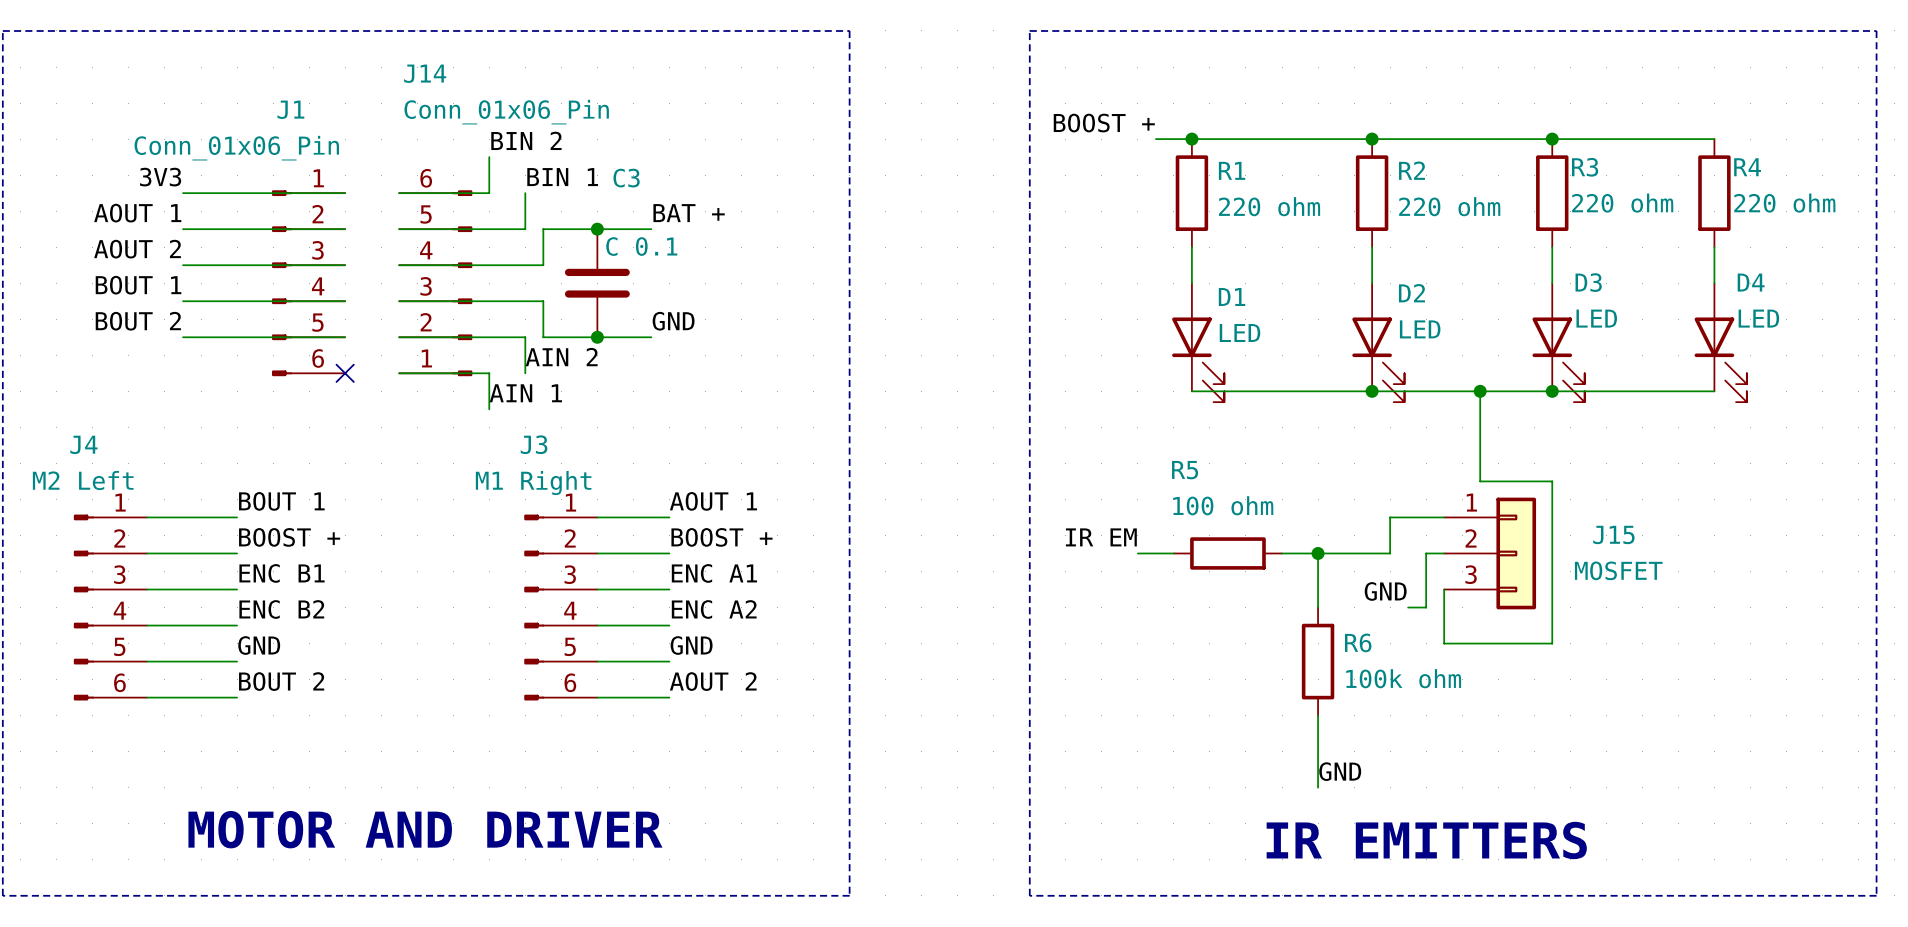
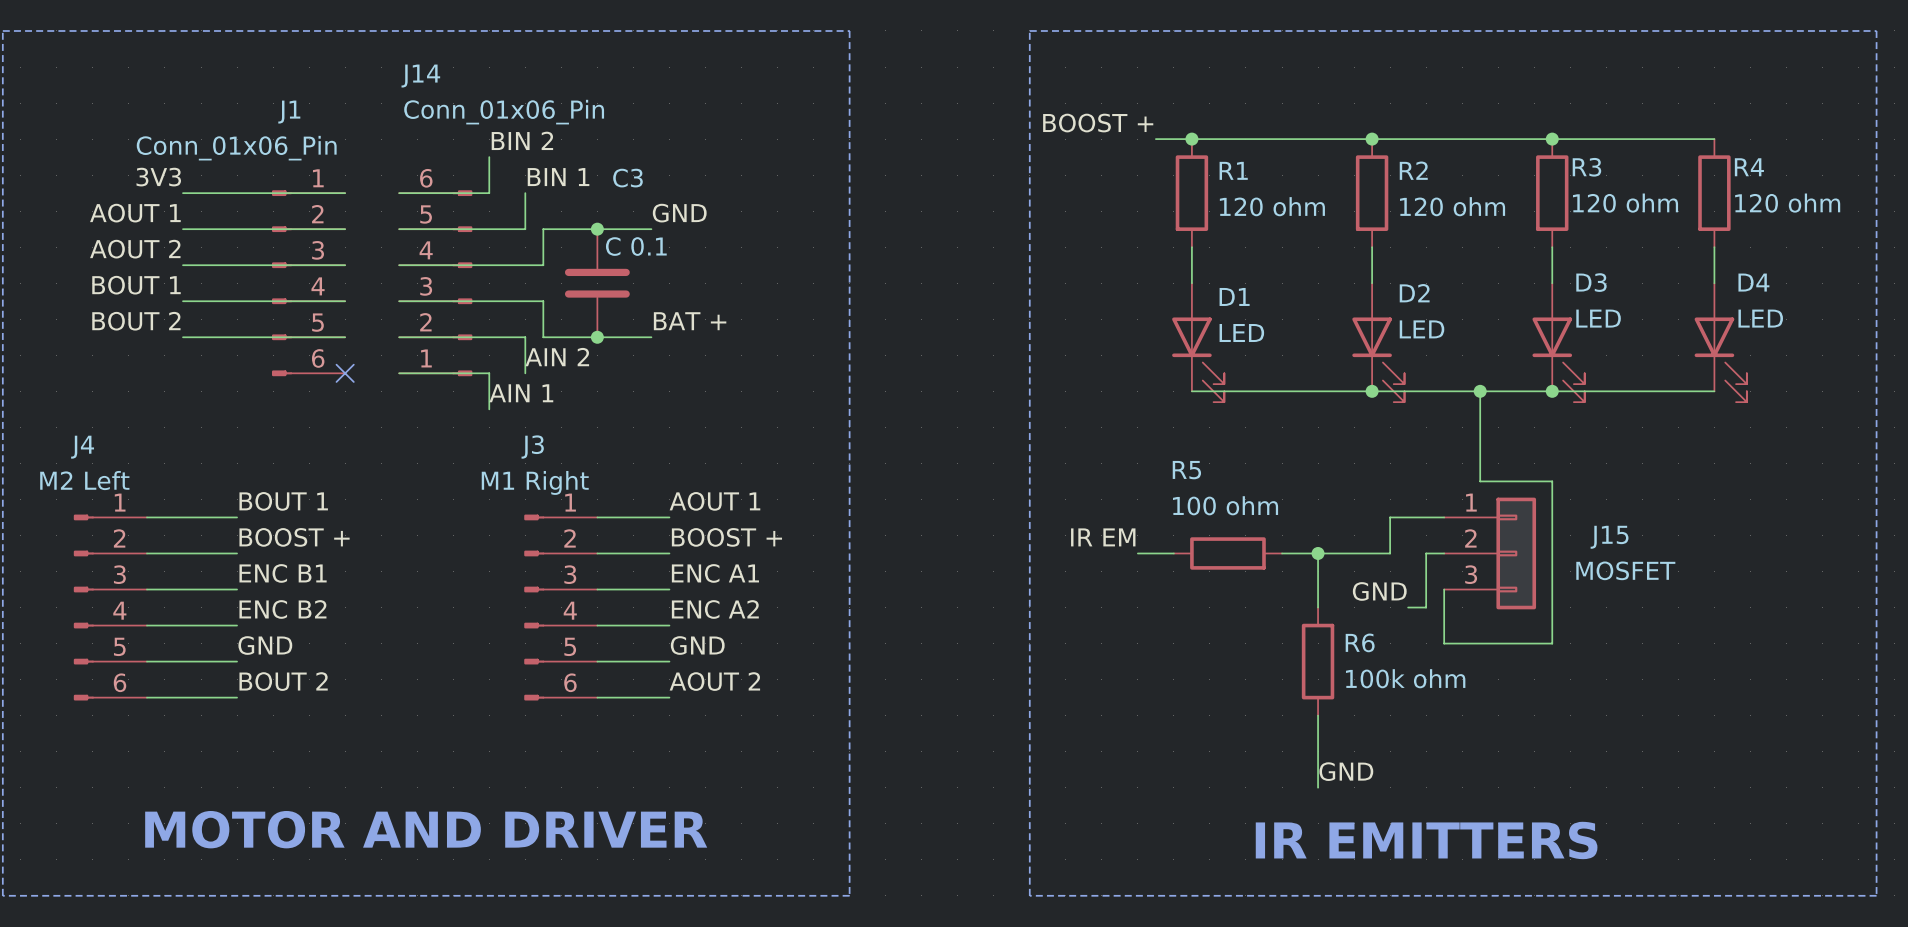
R3 value: 220 ohm (1622, 203) -> 120 ohm (1625, 203)
R4 value: 220 ohm (1784, 203) -> 120 ohm (1787, 203)
R1 value: 220 ohm (1269, 206) -> 120 ohm (1272, 206)
R2 value: 220 ohm (1449, 206) -> 120 ohm (1452, 206)
label: BAT + (689, 213) -> GND (679, 213)
label: GND (673, 321) -> BAT + (690, 321)

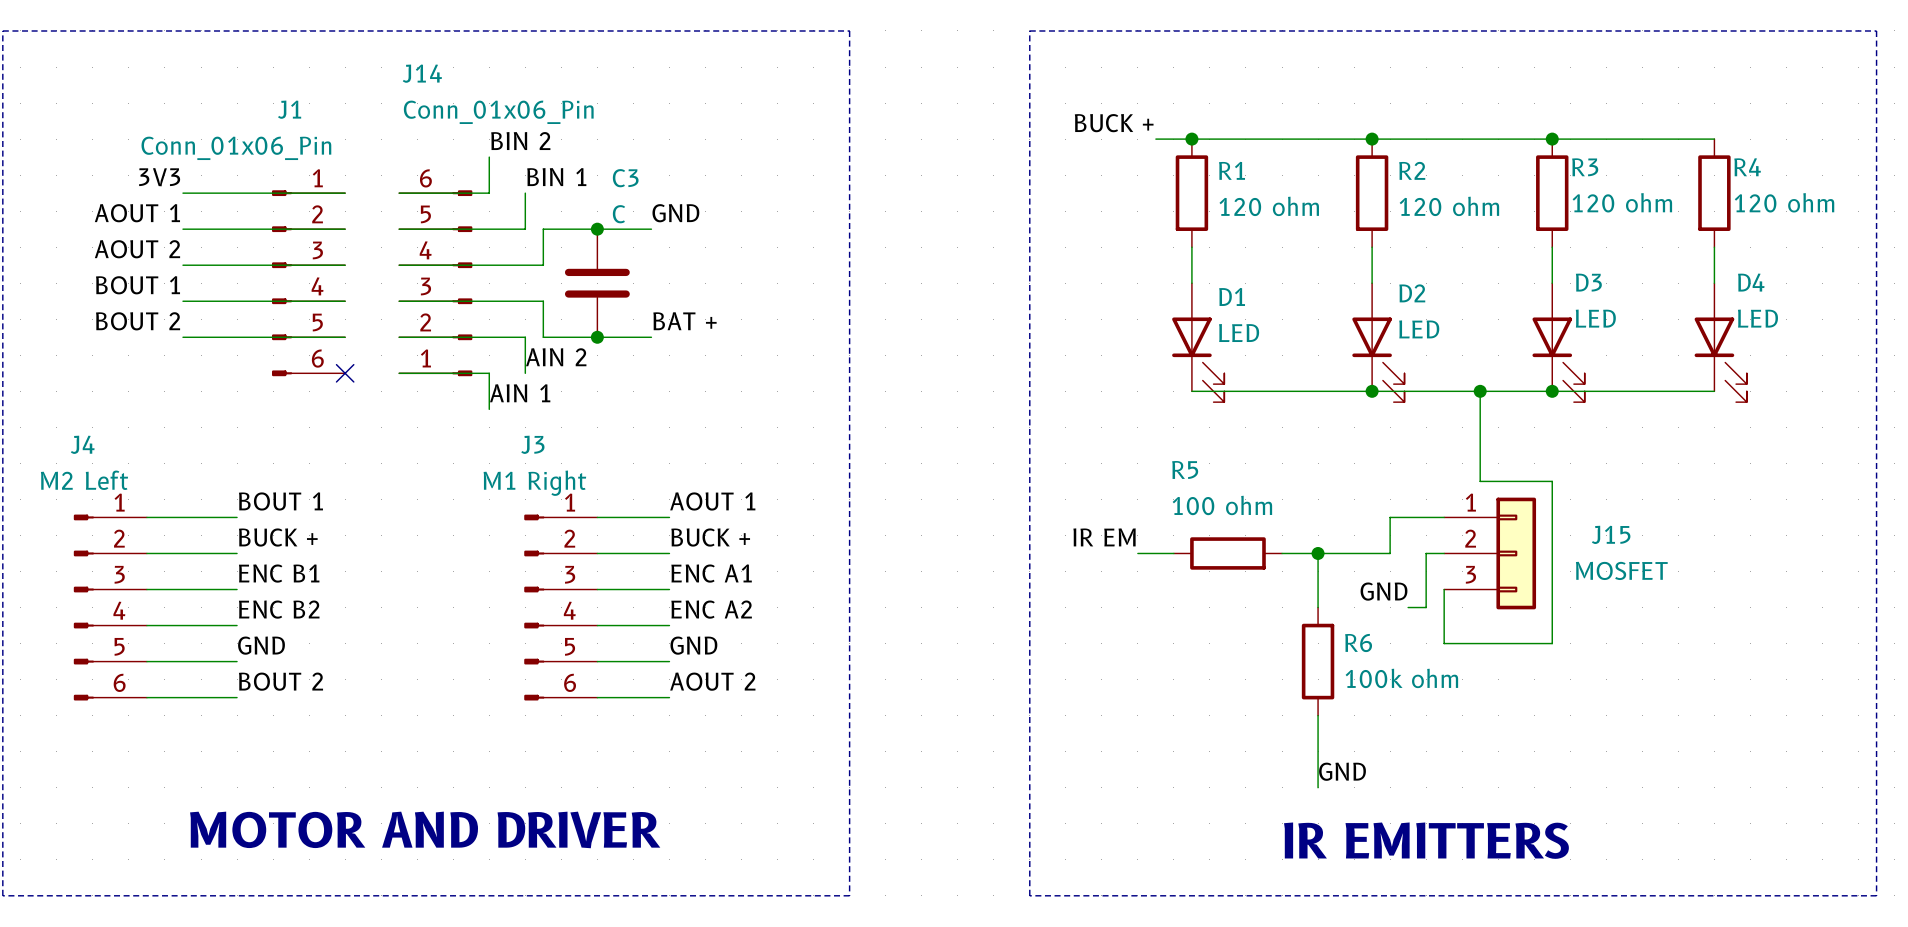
label: BOOST + (1098, 123) -> BUCK + (1114, 123)
C3 value: C 0.1 (636, 246) -> C (618, 214)
label: BOOST + (294, 537) -> BUCK + (278, 537)
label: BOOST + (726, 537) -> BUCK + (710, 537)

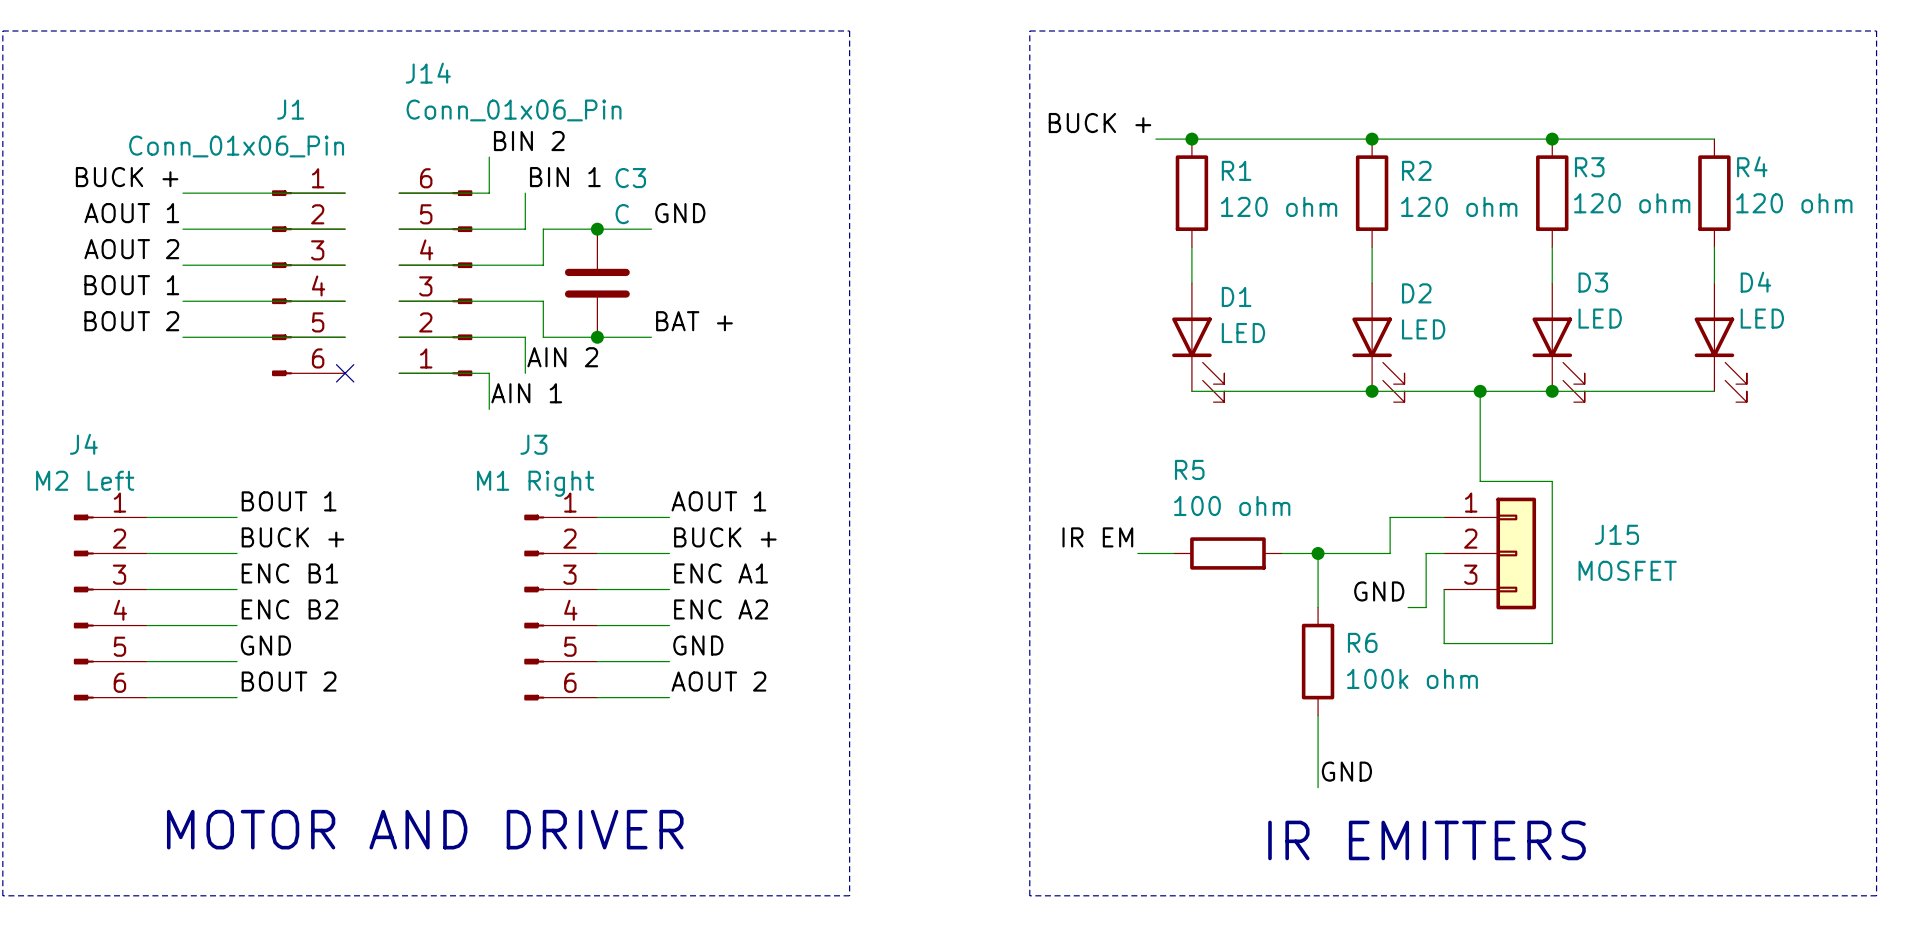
label: 3V3 (159, 177) -> BUCK + (127, 177)

